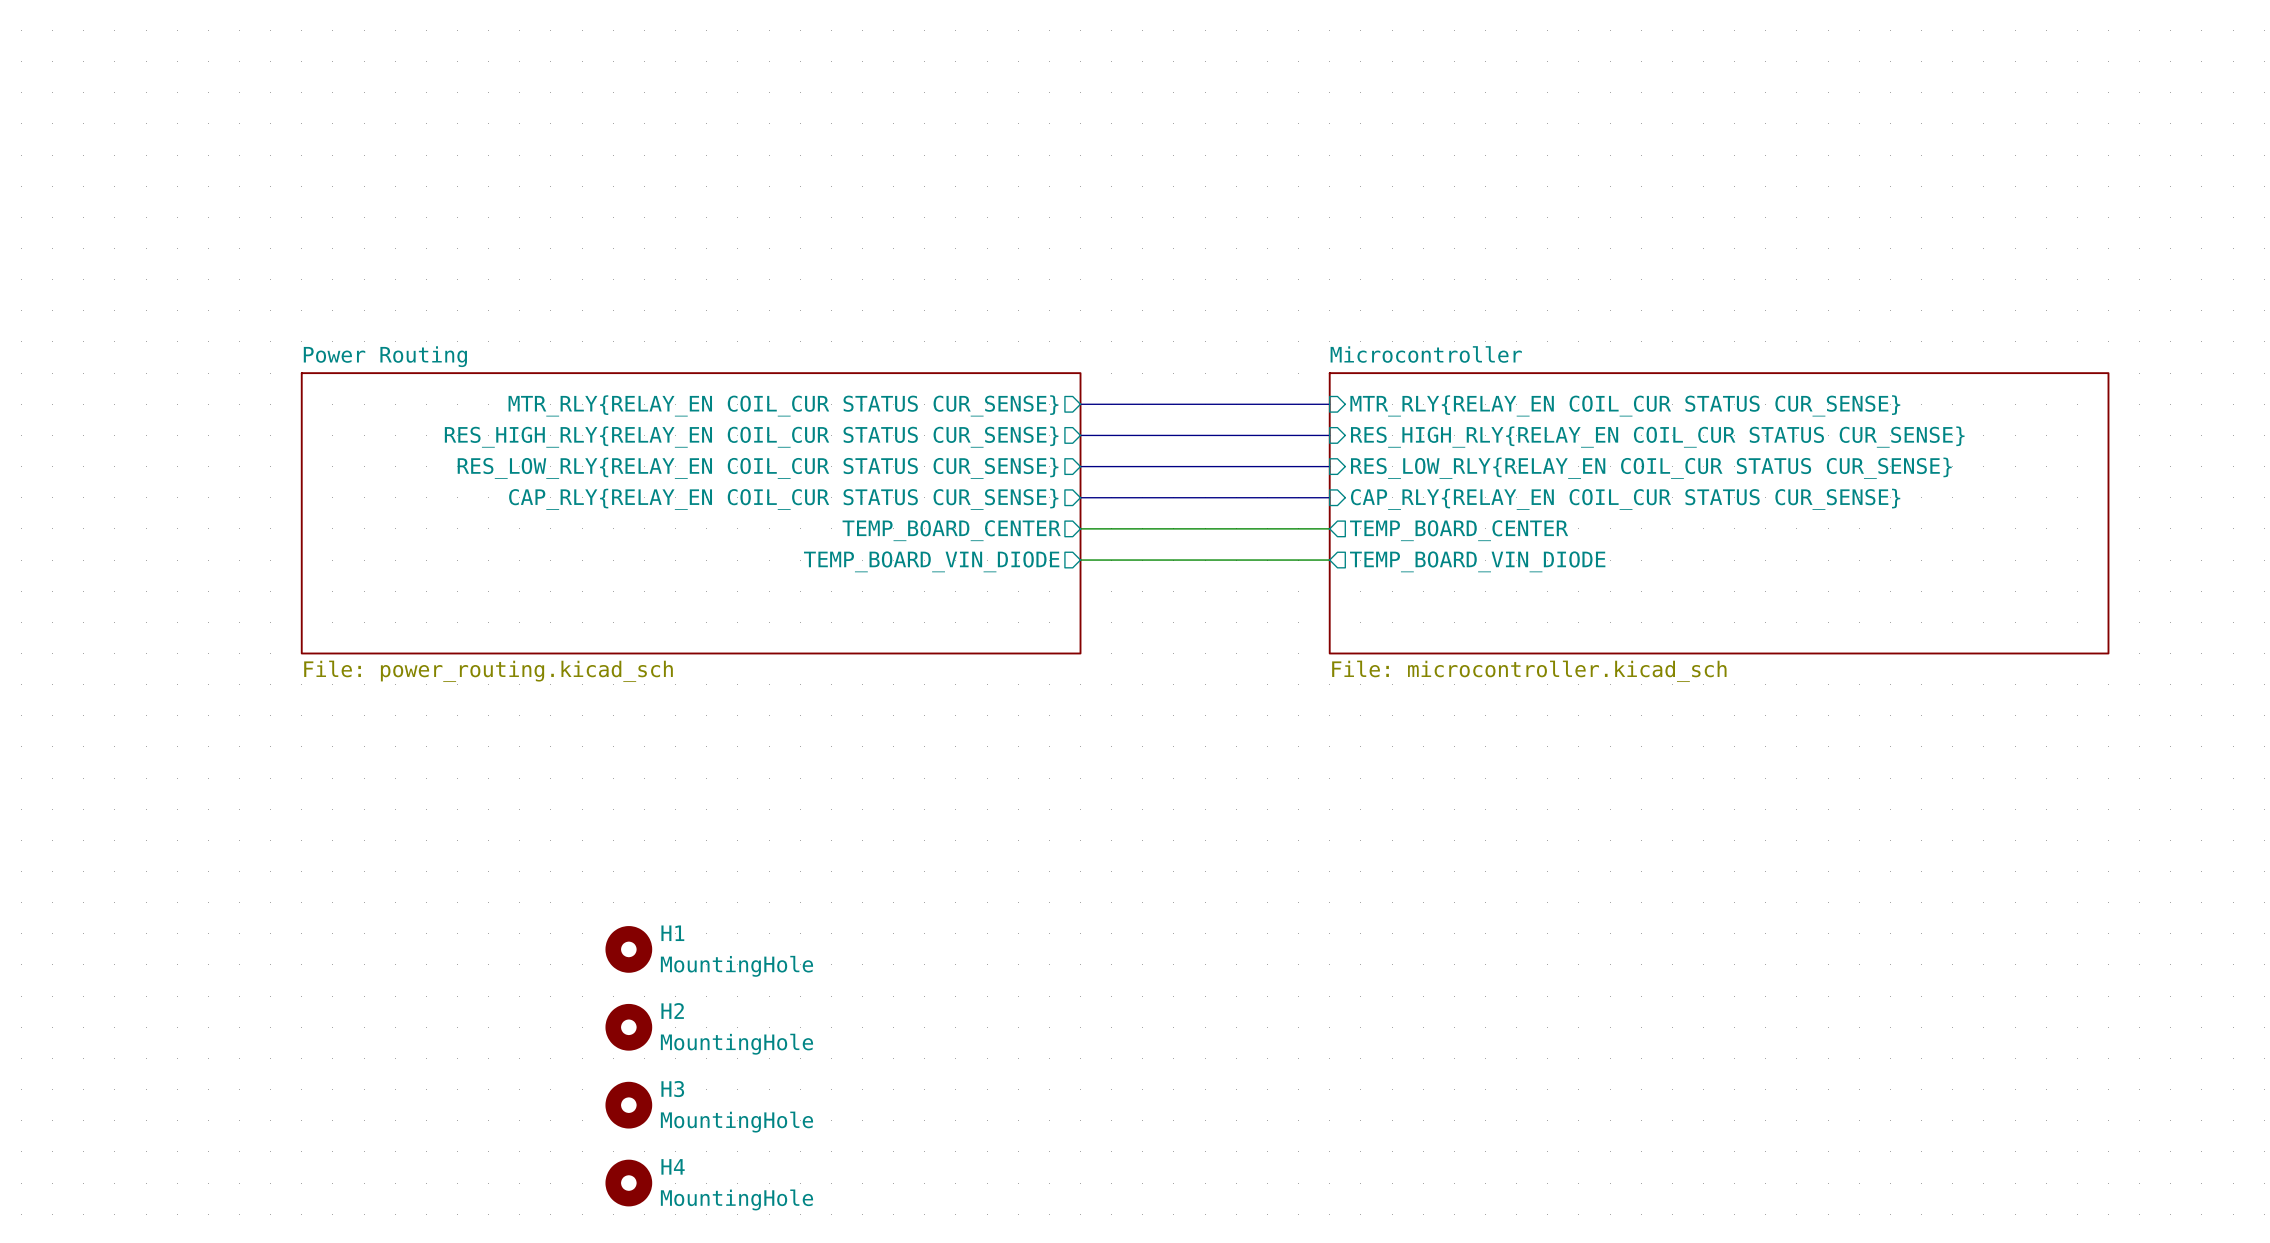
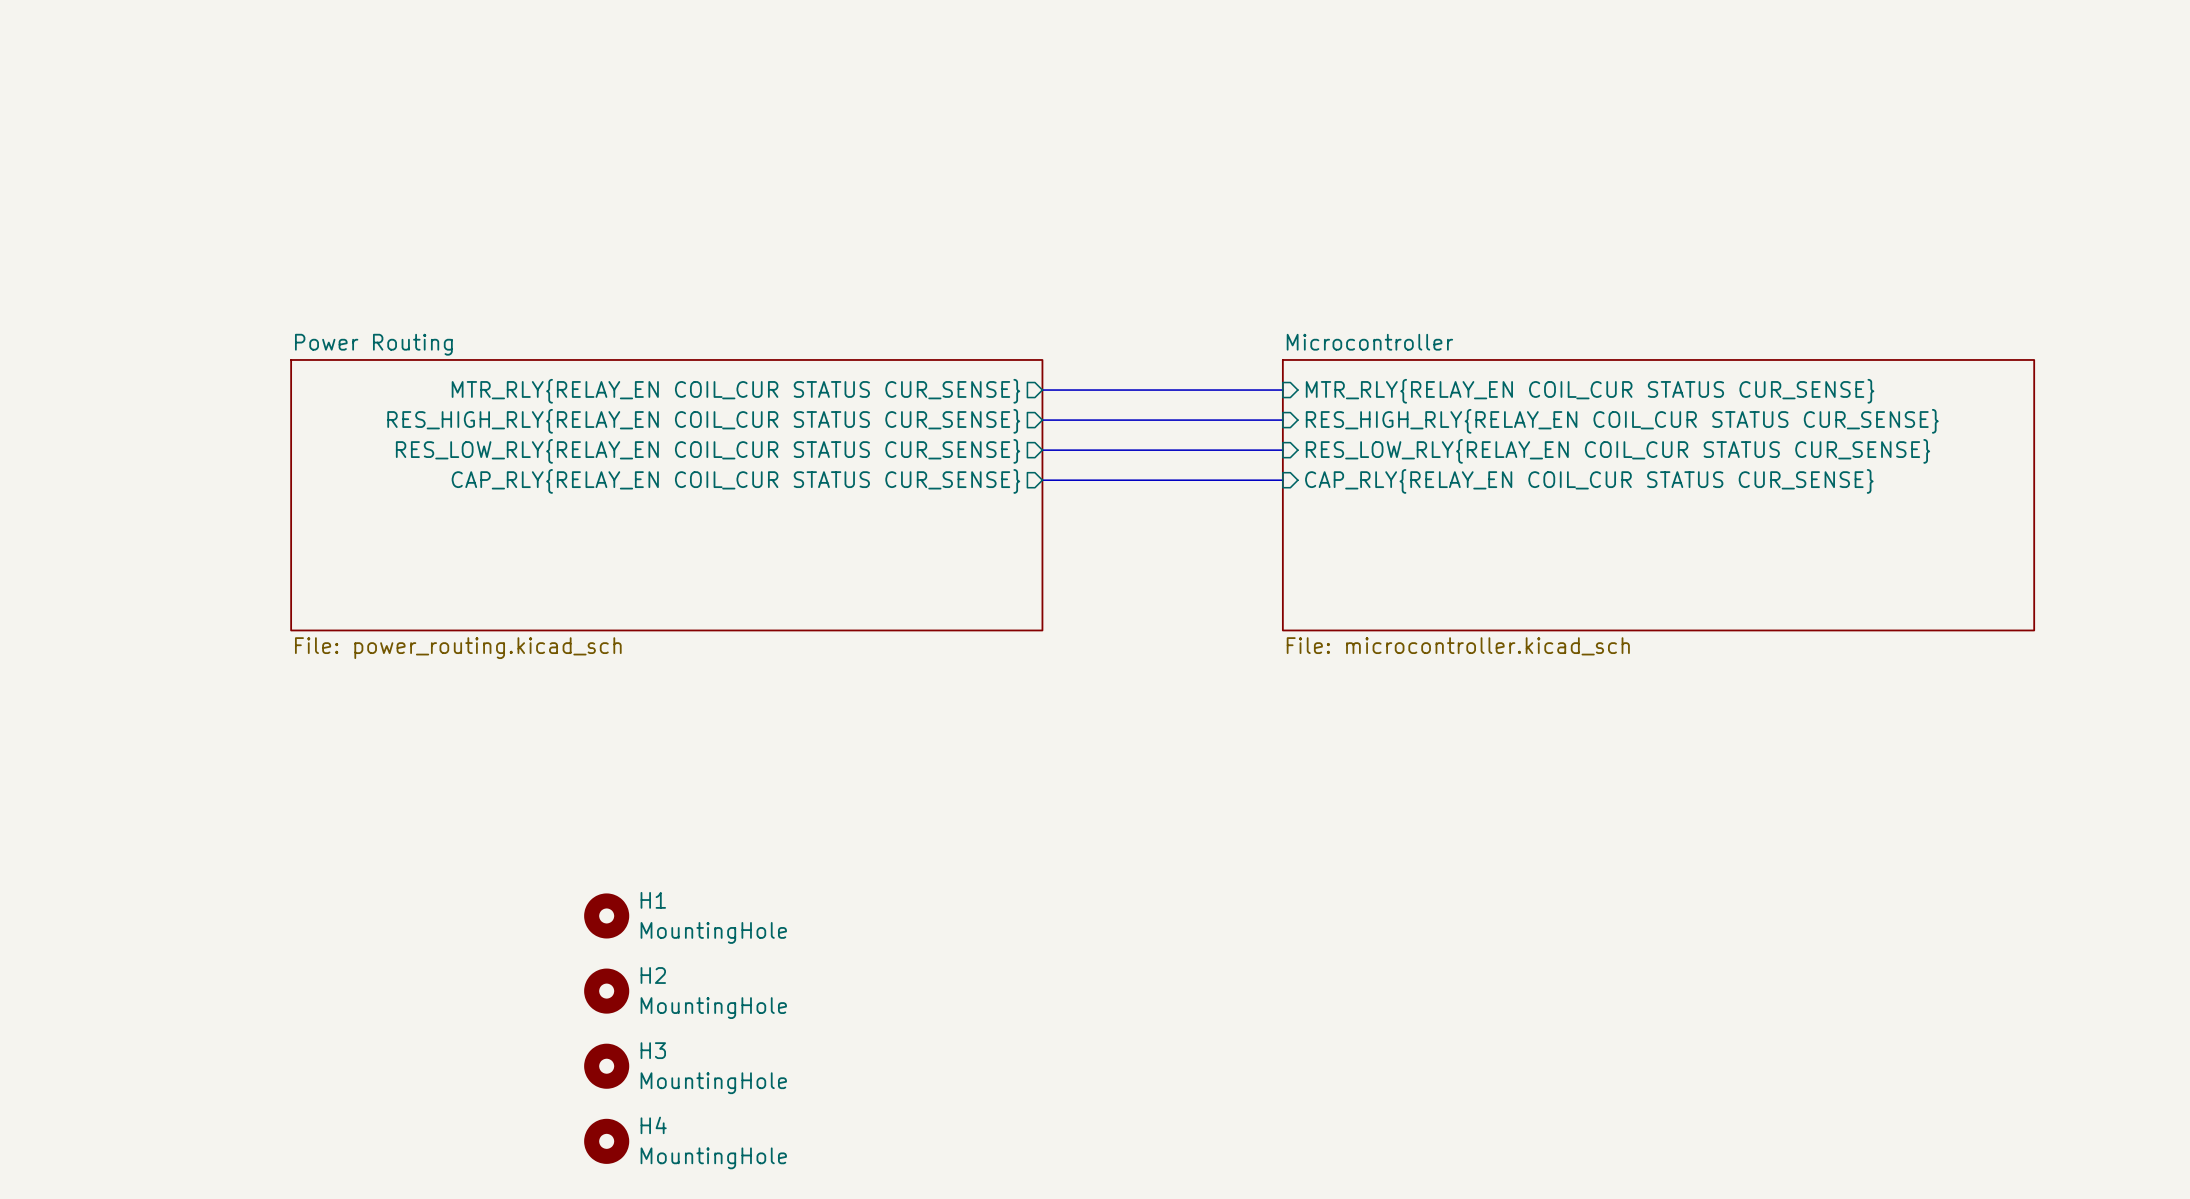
wire: (1080, 528) (1329, 528) -> none
sheet pin: TEMP_BOARD_CENTER (951, 530) -> none
sheet pin: TEMP_BOARD_CENTER (1459, 530) -> none
wire: (1080, 560) (1329, 560) -> none
sheet pin: TEMP_BOARD_VIN_DIODE (931, 561) -> none
sheet pin: TEMP_BOARD_VIN_DIODE (1477, 561) -> none

